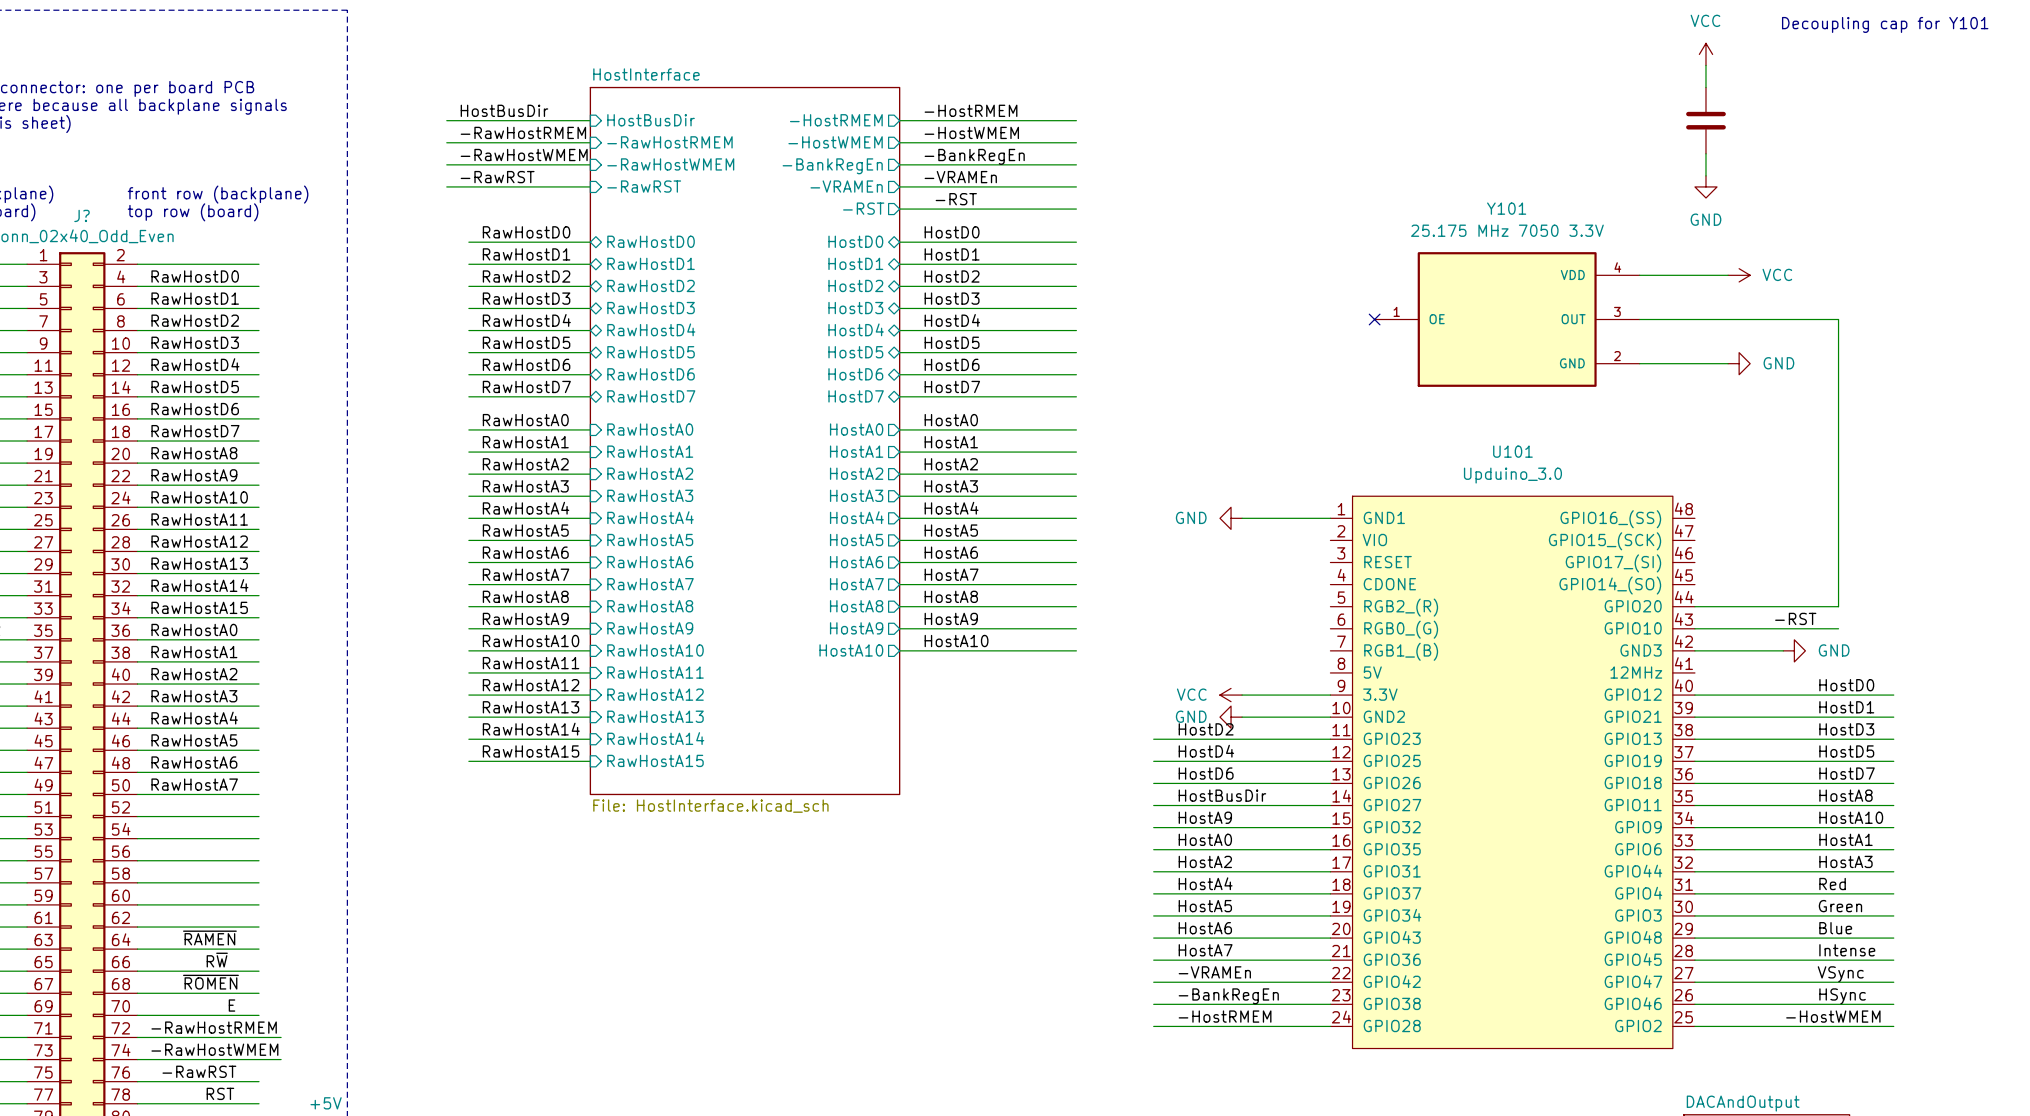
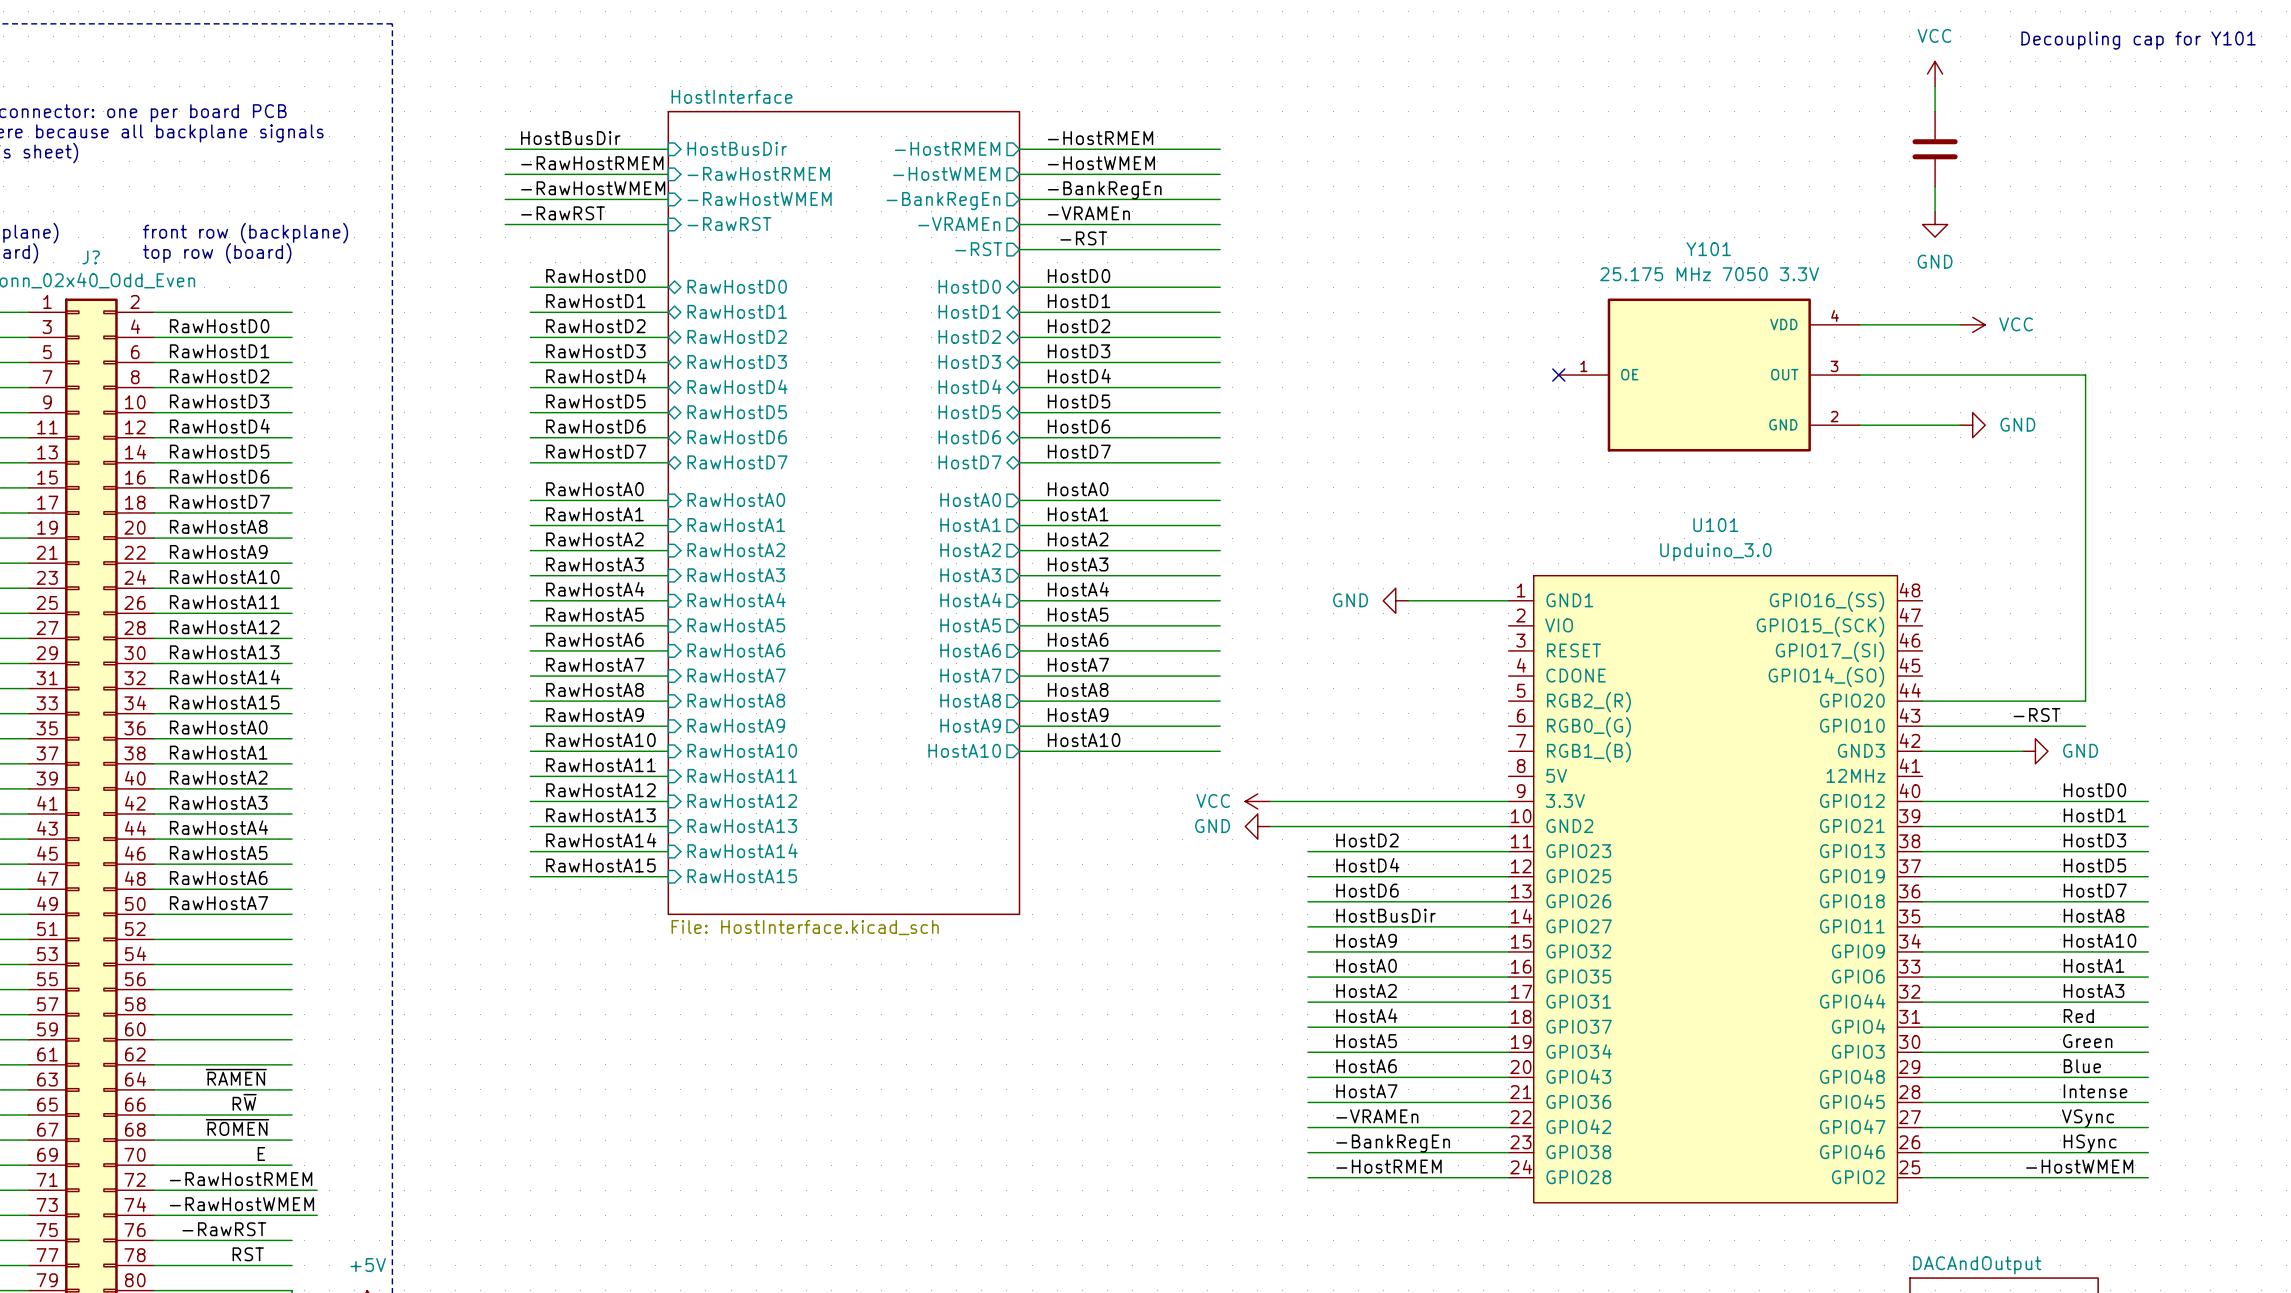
wire: none -> (1270, 801) (1408, 801)
power symbol position: VCC (1231, 695) -> VCC (1257, 801)
wire: none -> (1270, 826) (1408, 826)
power symbol position: GND (1231, 717) -> GND (1257, 826)

